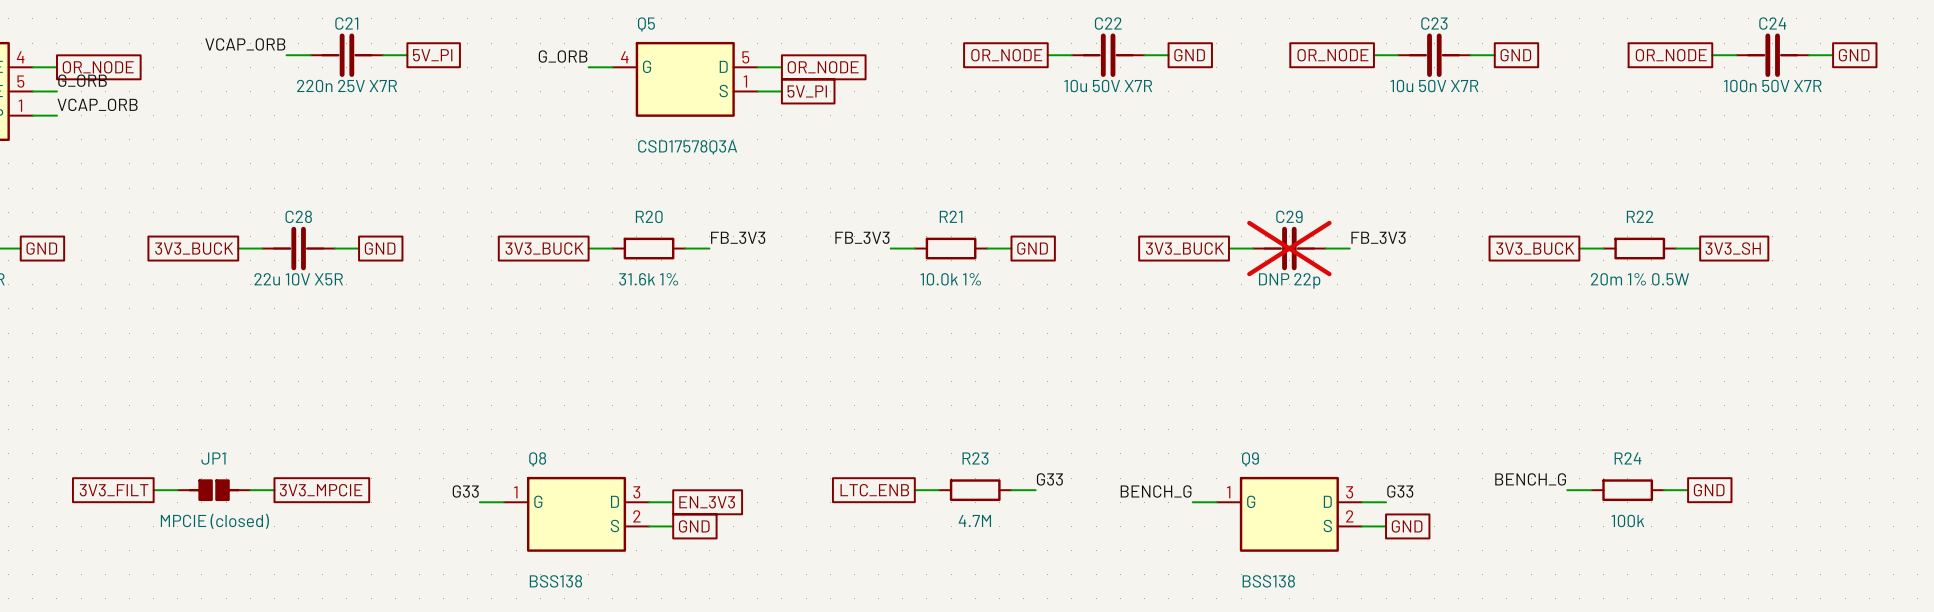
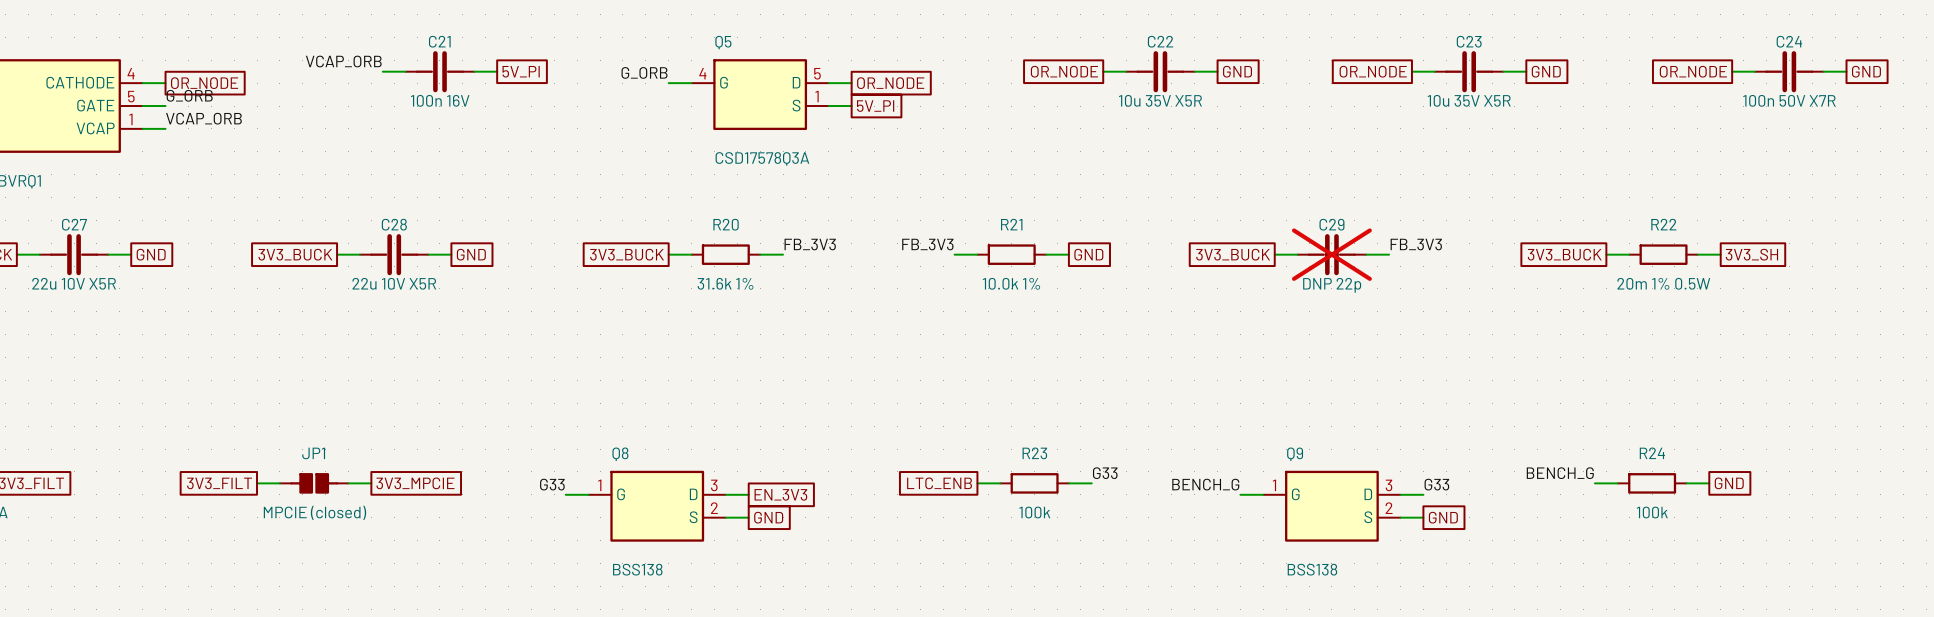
C21 value: 220n 25V X7R (347, 86) -> 100n 16V (440, 100)
C22 value: 10u 50V X7R (1108, 86) -> 10u 35V X5R (1160, 100)
C23 value: 10u 50V X7R (1434, 86) -> 10u 35V X5R (1469, 100)
R23 value: 4.7M (974, 520) -> 100k (1034, 512)

